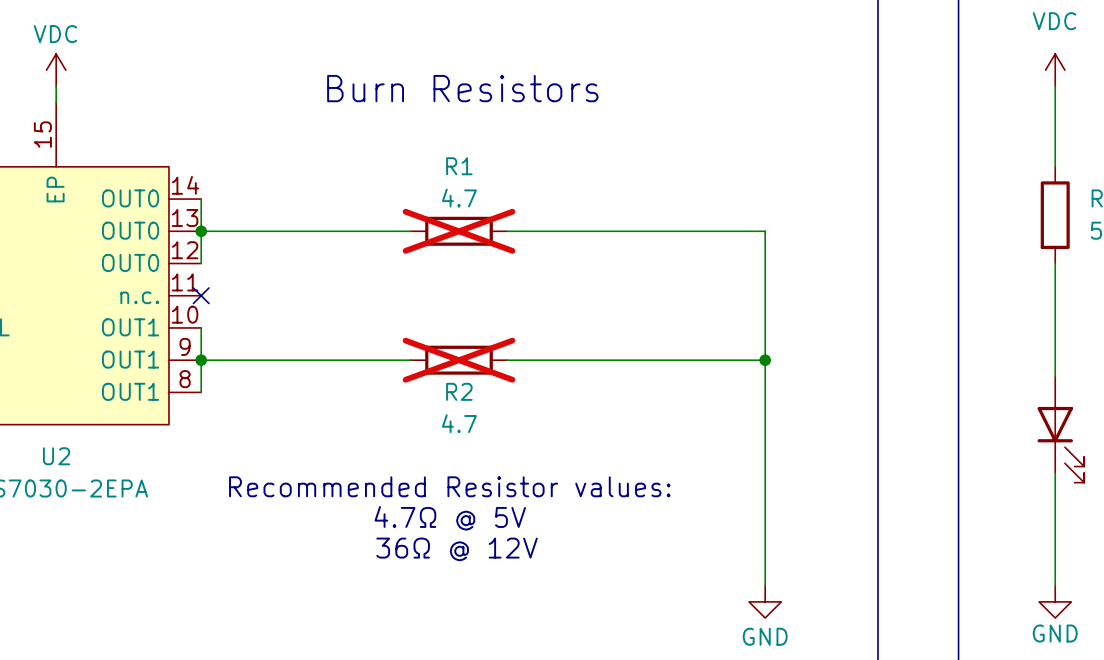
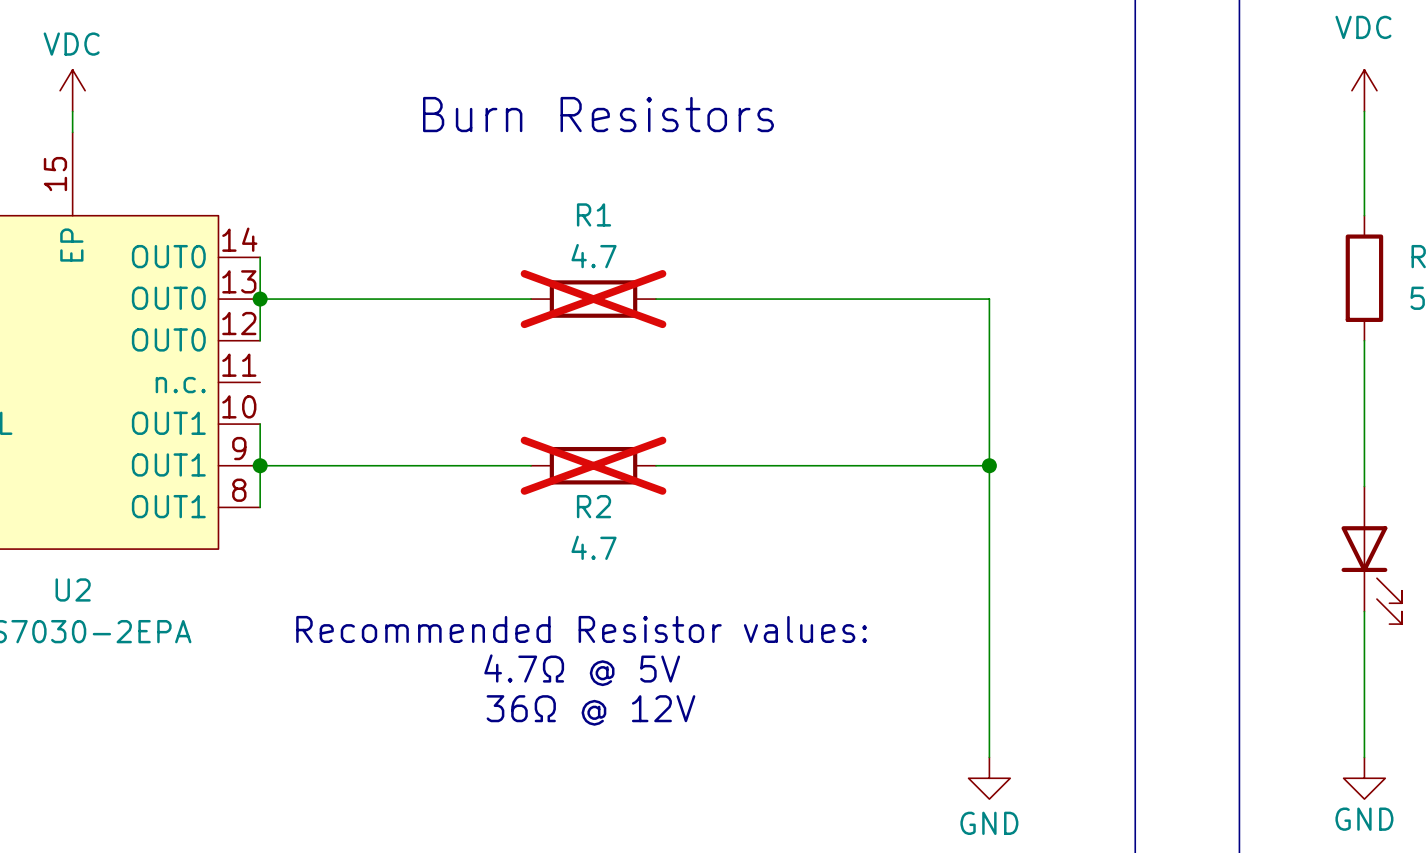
no-connect mark: (201, 295) -> none

